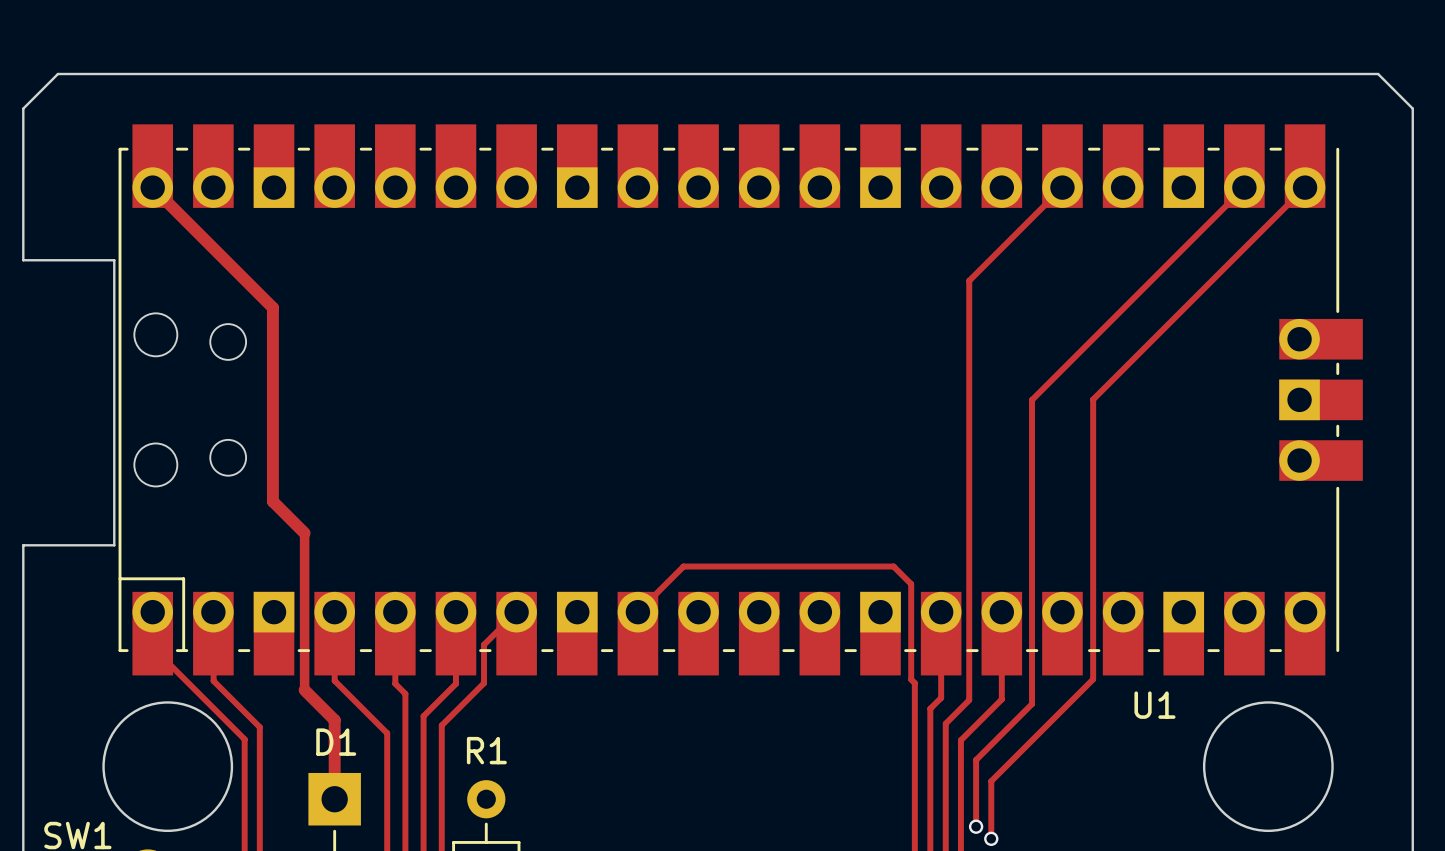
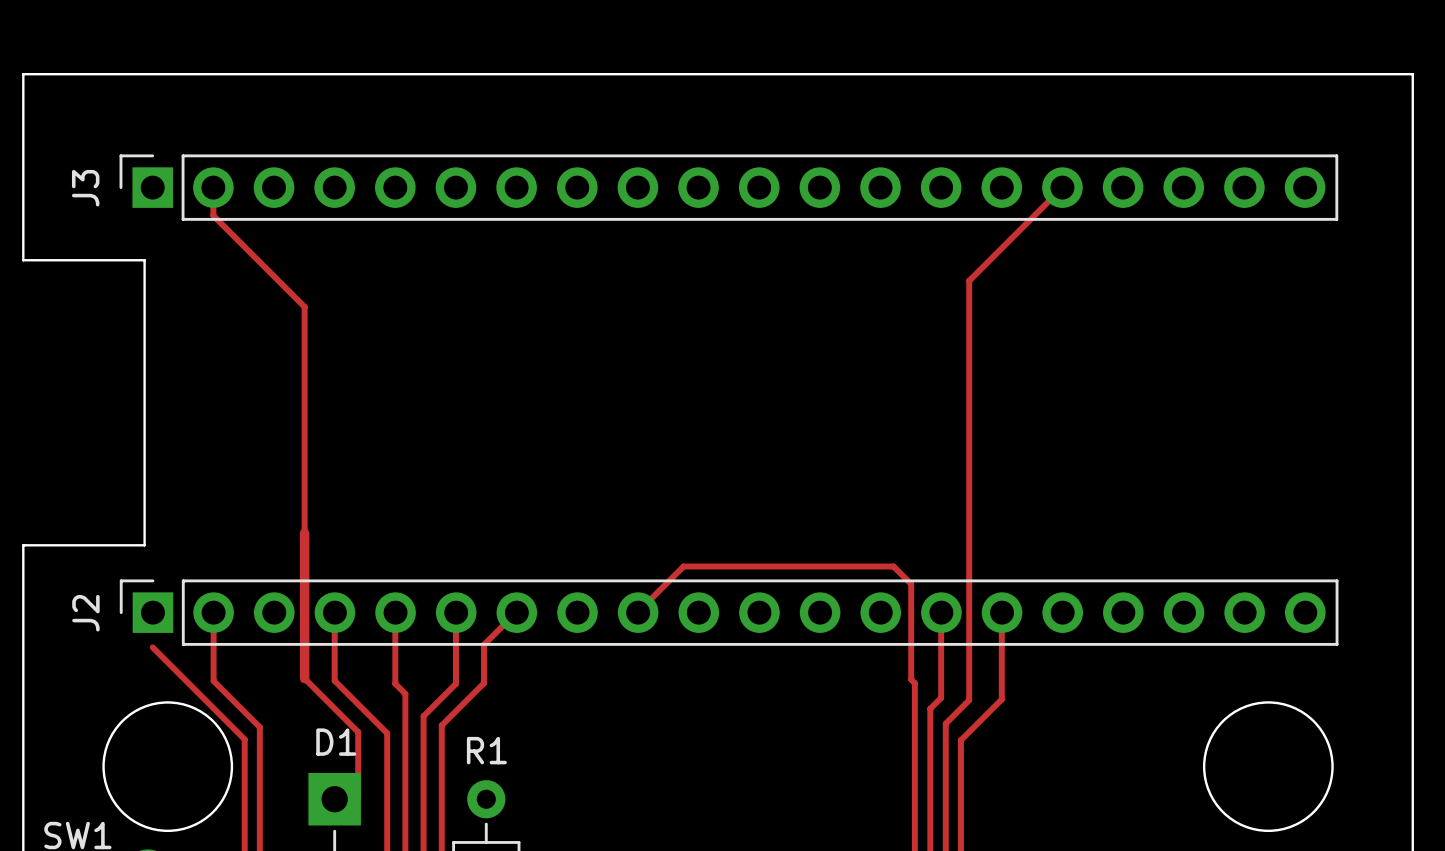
board edge: (23, 108) (57, 74) (1378, 74) (1412, 108) -> (23, 108) (23, 74) (1412, 74) (1412, 108)
track: (152, 187) (272, 307) (272, 501) (304, 533) -> (213, 187) (213, 215) (304, 306) (304, 533)
J3: none -> (728, 187)
track: (1244, 187) (1032, 400) (1032, 704) (976, 759) (976, 821) (978, 824) -> none
track: (1305, 187) (1093, 399) (1093, 679) (991, 781) (991, 833) (993, 836) -> none
board edge: (114, 260) (114, 545) -> (114, 260) (144, 260) (144, 545) (114, 545)
U1: (740, 399) -> none
J2: none -> (729, 612)
track: (304, 678) (304, 690) (334, 720) (334, 798) -> (304, 678) (358, 732) (358, 798)
via: (976, 826) -> none
via: (991, 838) -> none

